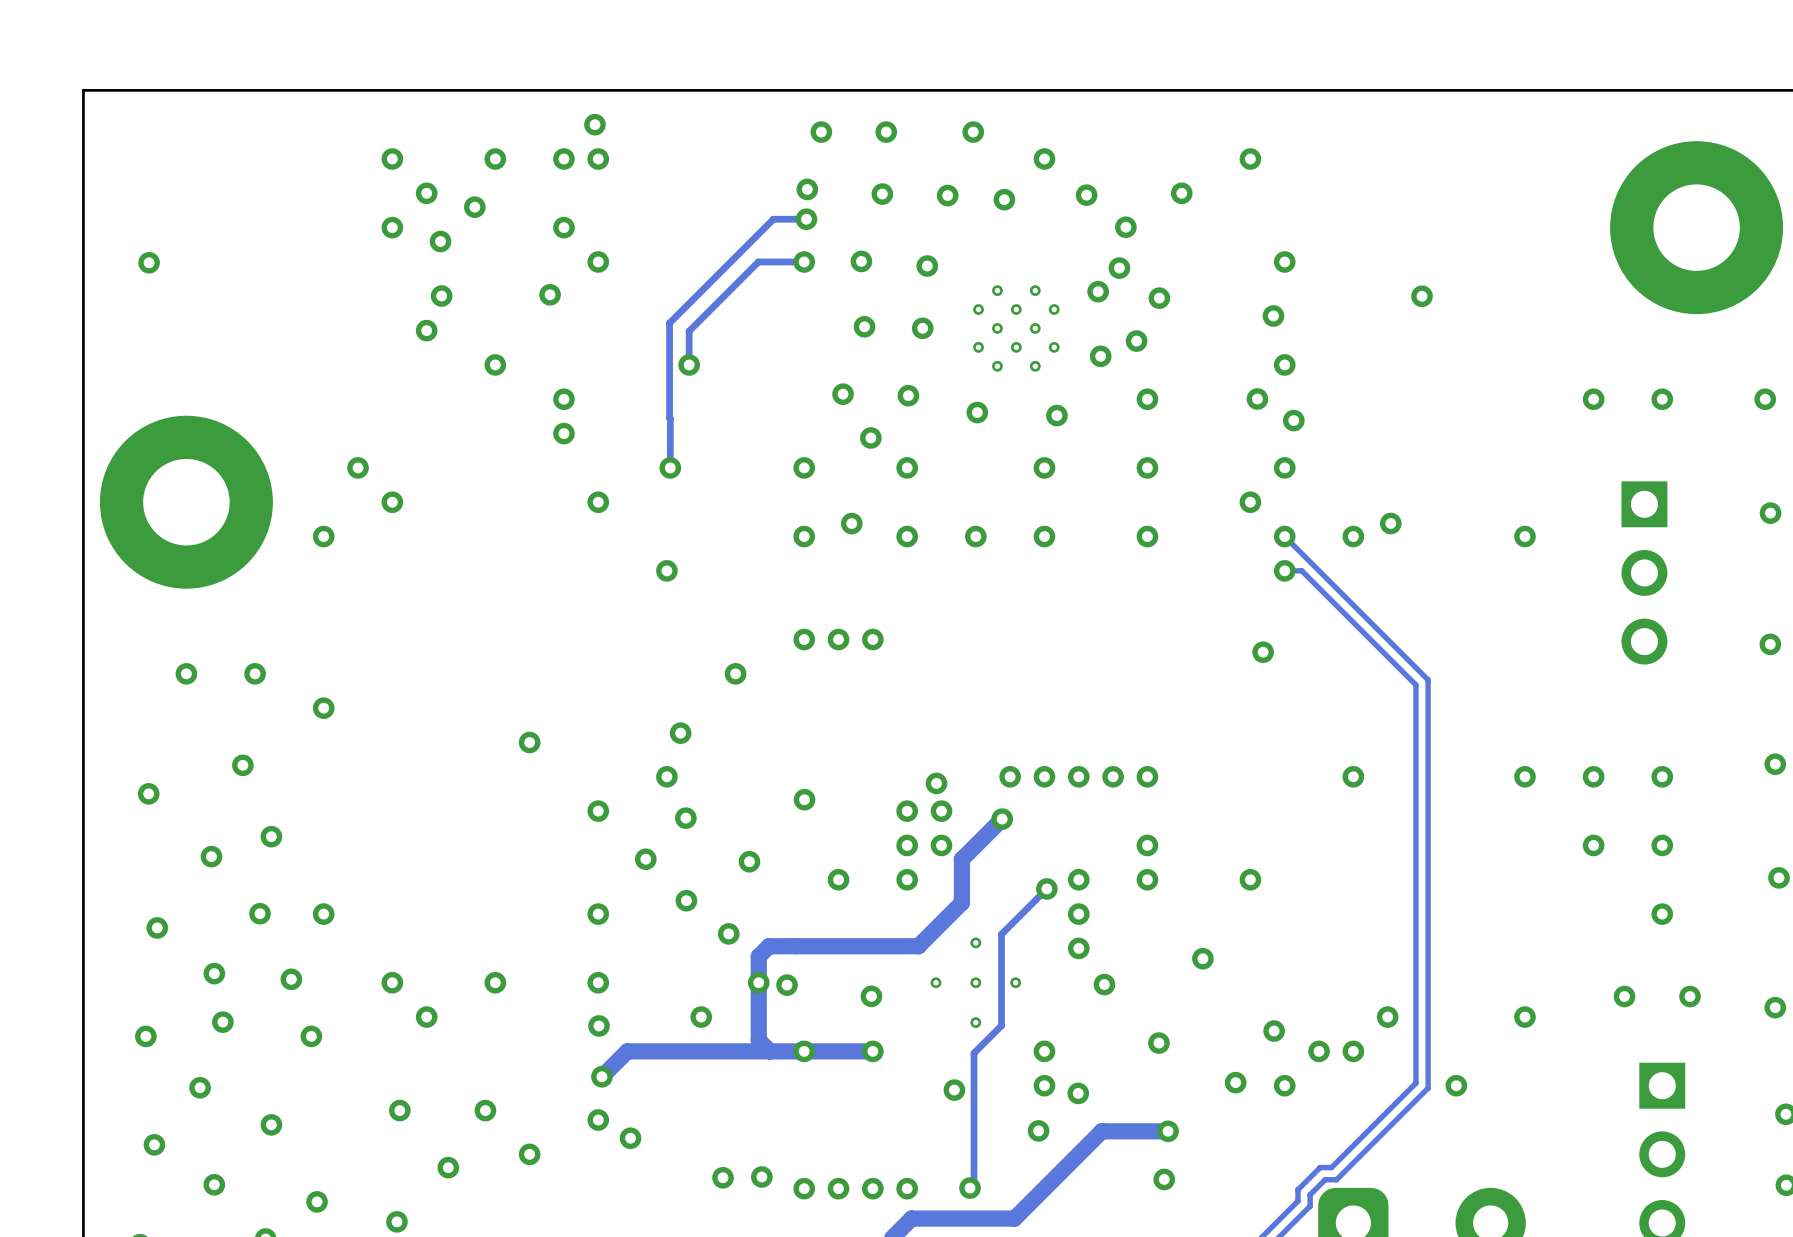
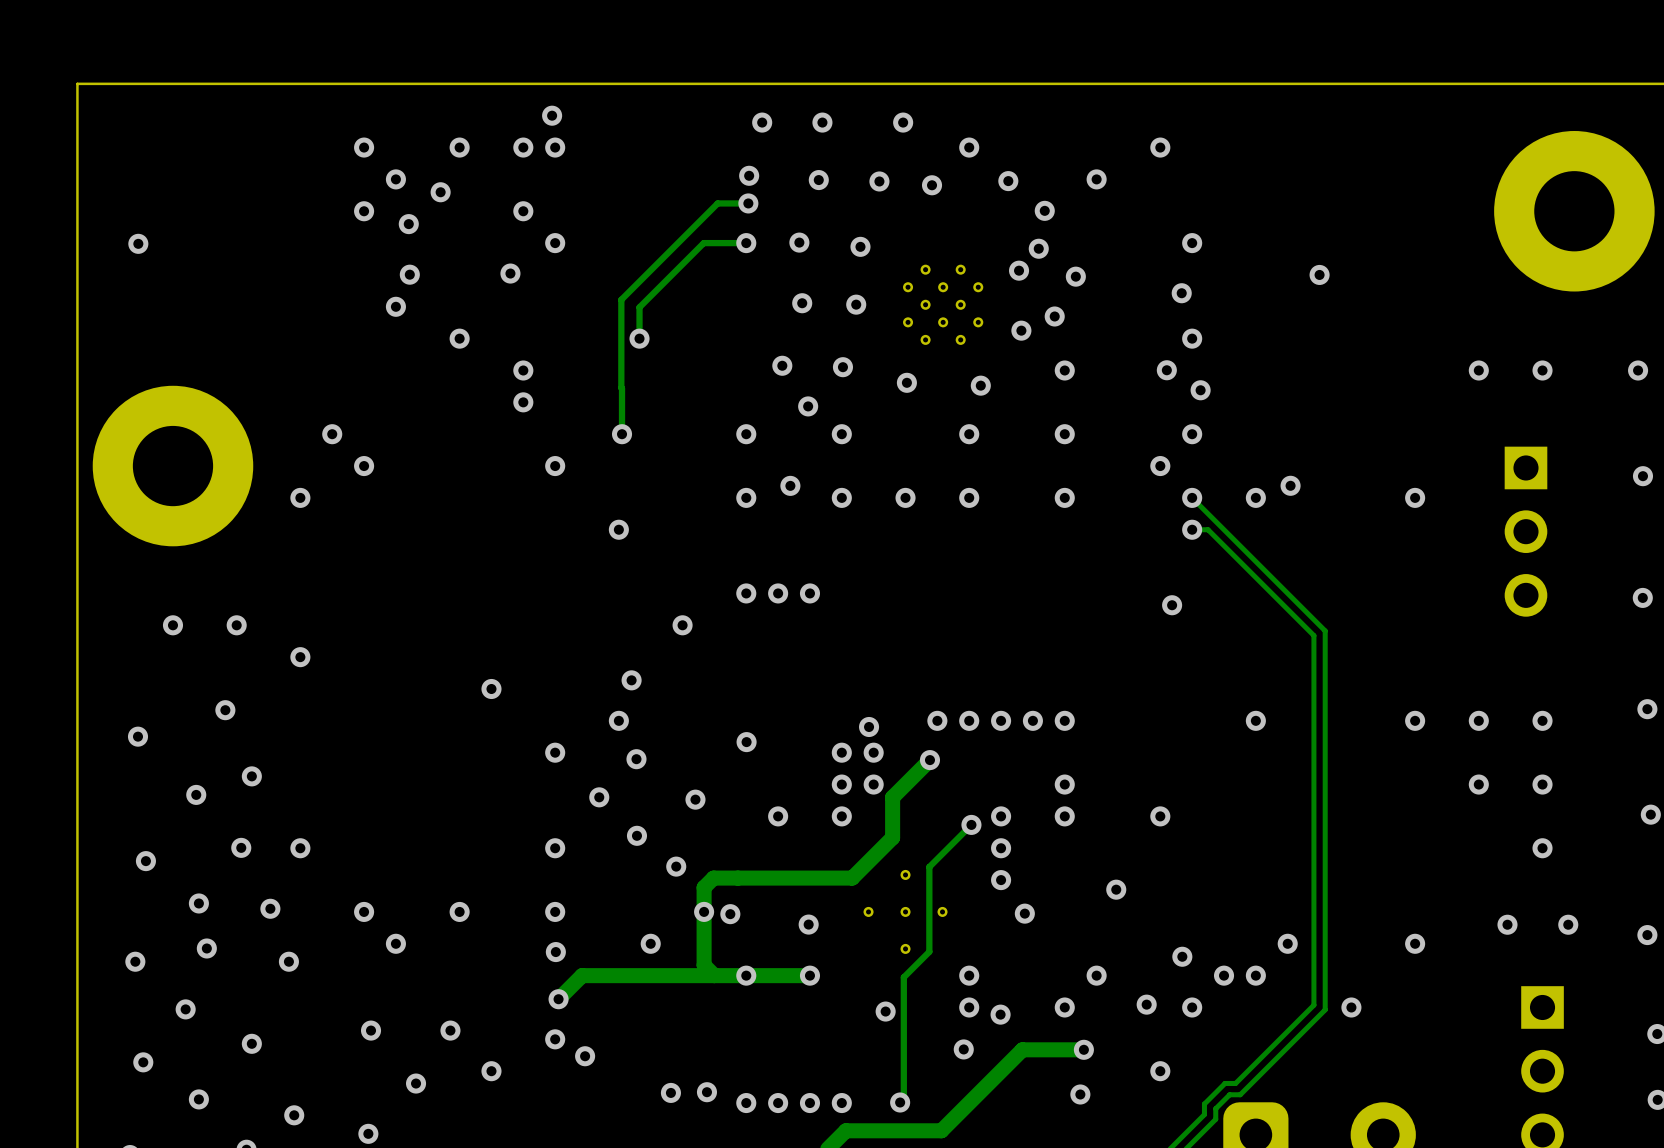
via: (1158, 1043) -> none
via: none -> (1096, 975)
via: none -> (1064, 1007)
via: none -> (1160, 1071)

